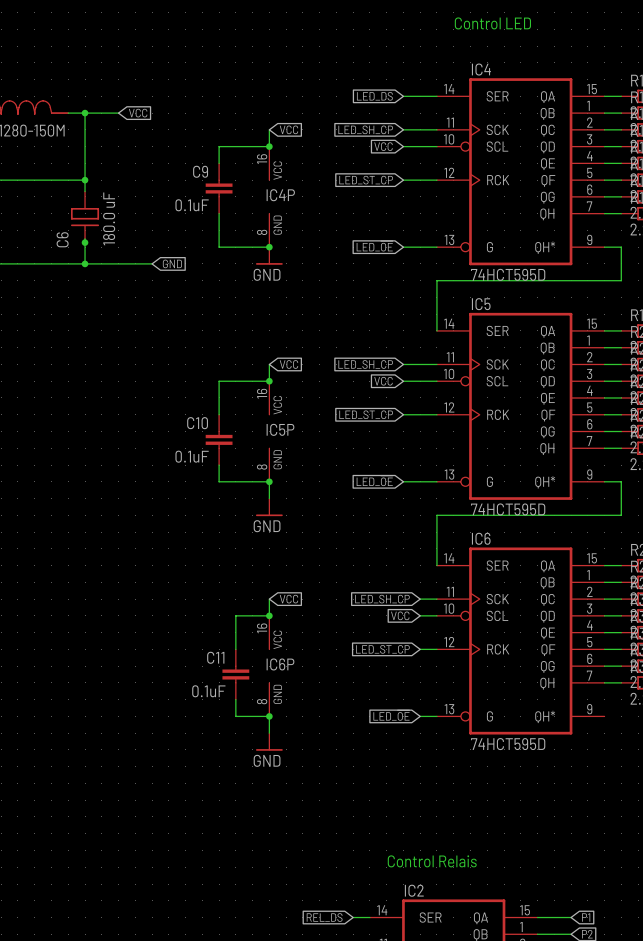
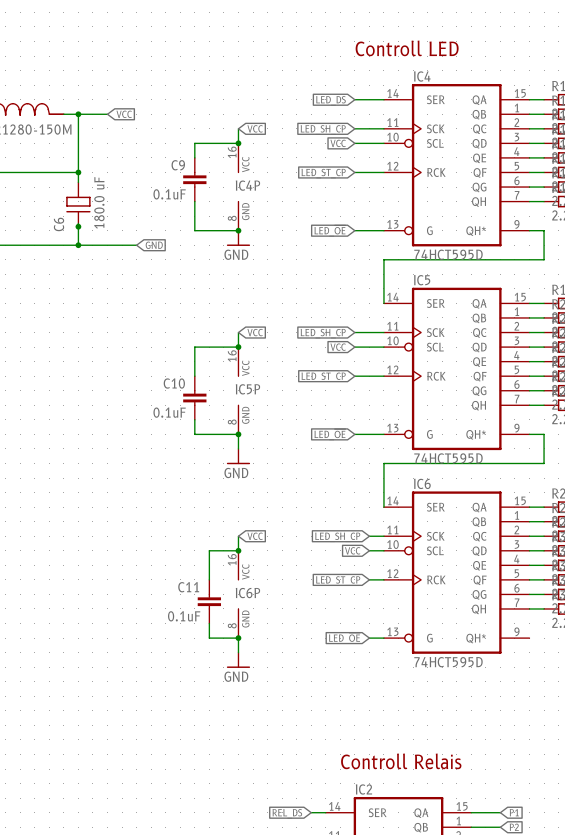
text: Control LED (492, 23) -> Controll LED (407, 48)
text: Control Relais (432, 861) -> Controll Relais (401, 761)

